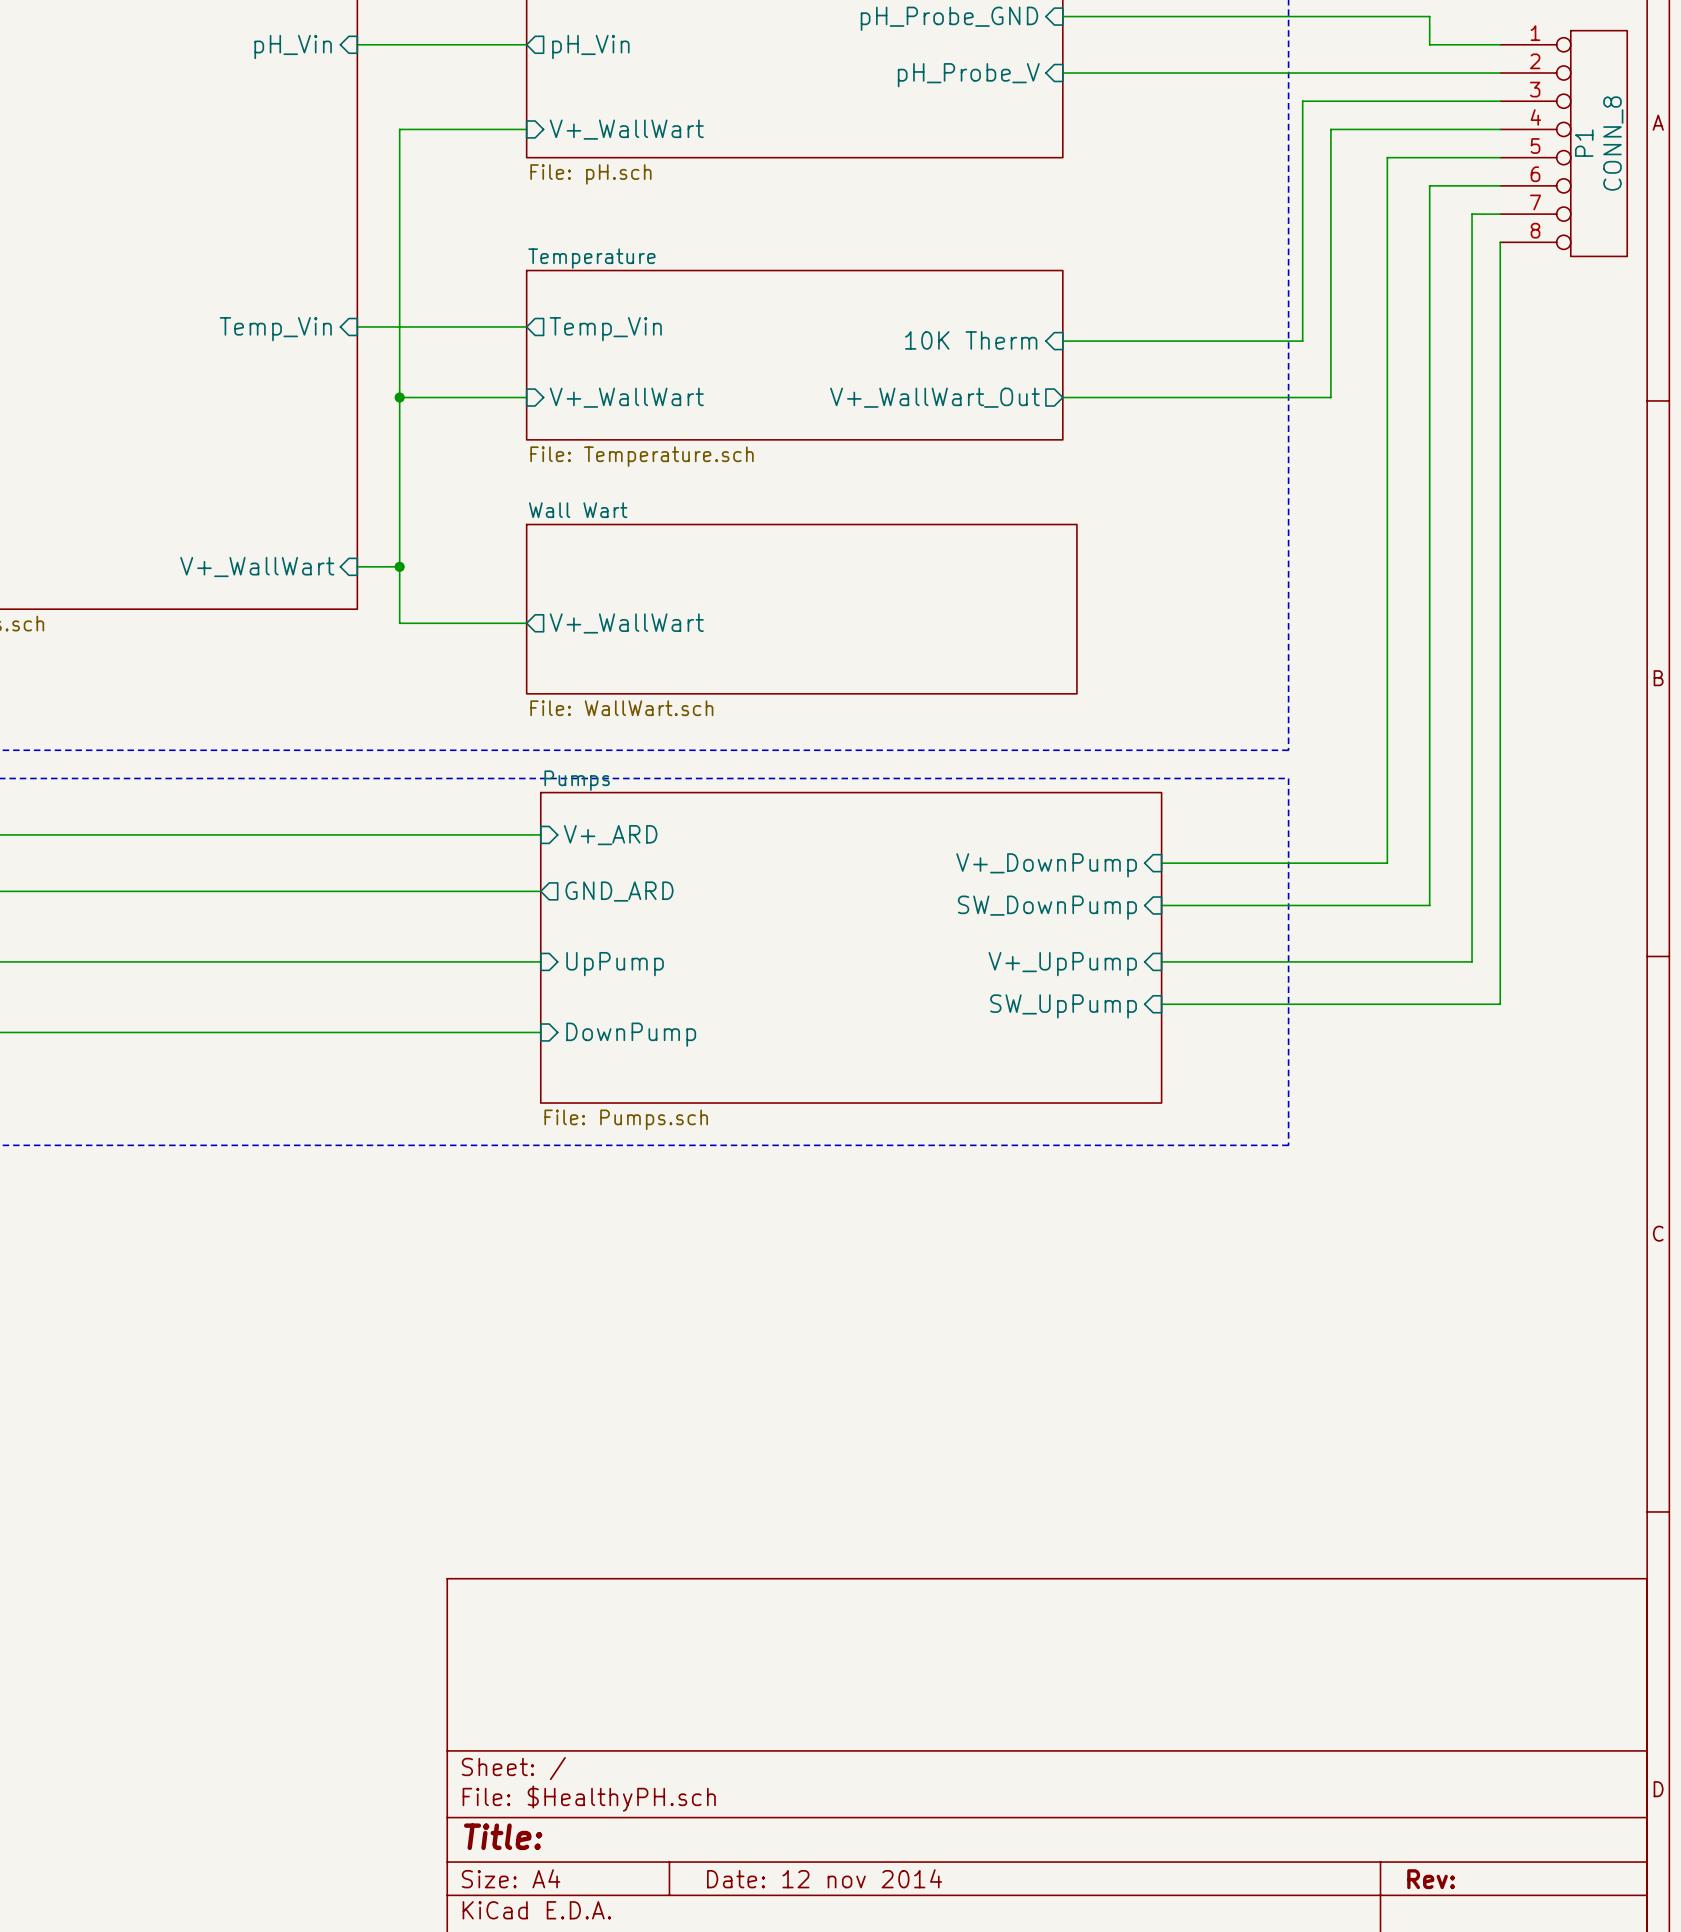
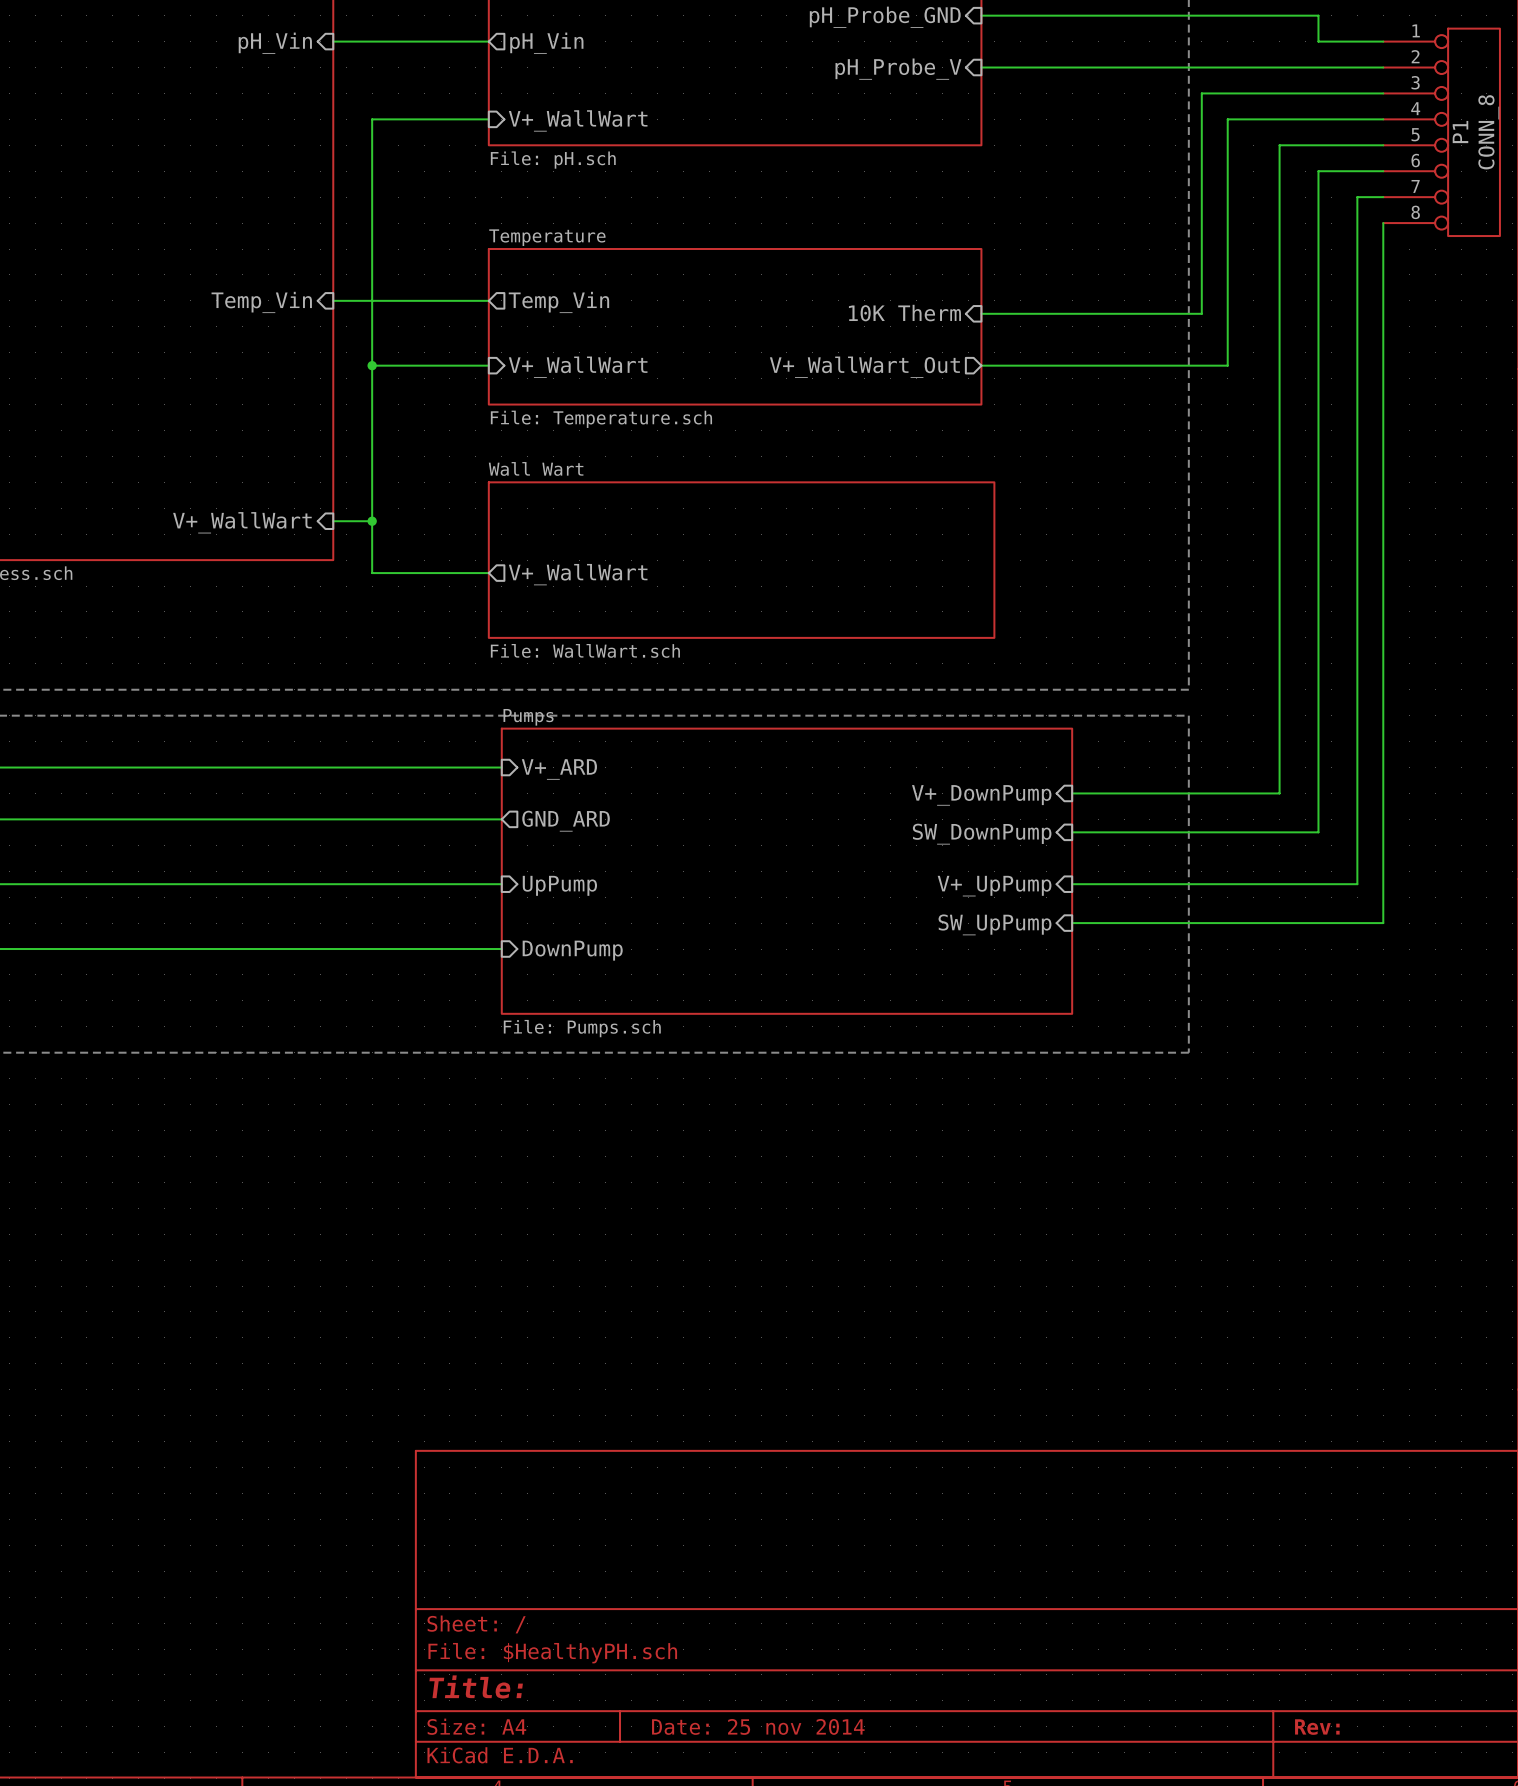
title block: Date: 12 nov 2014 (824, 1878) -> Date: 25 nov 2014 (758, 1726)

